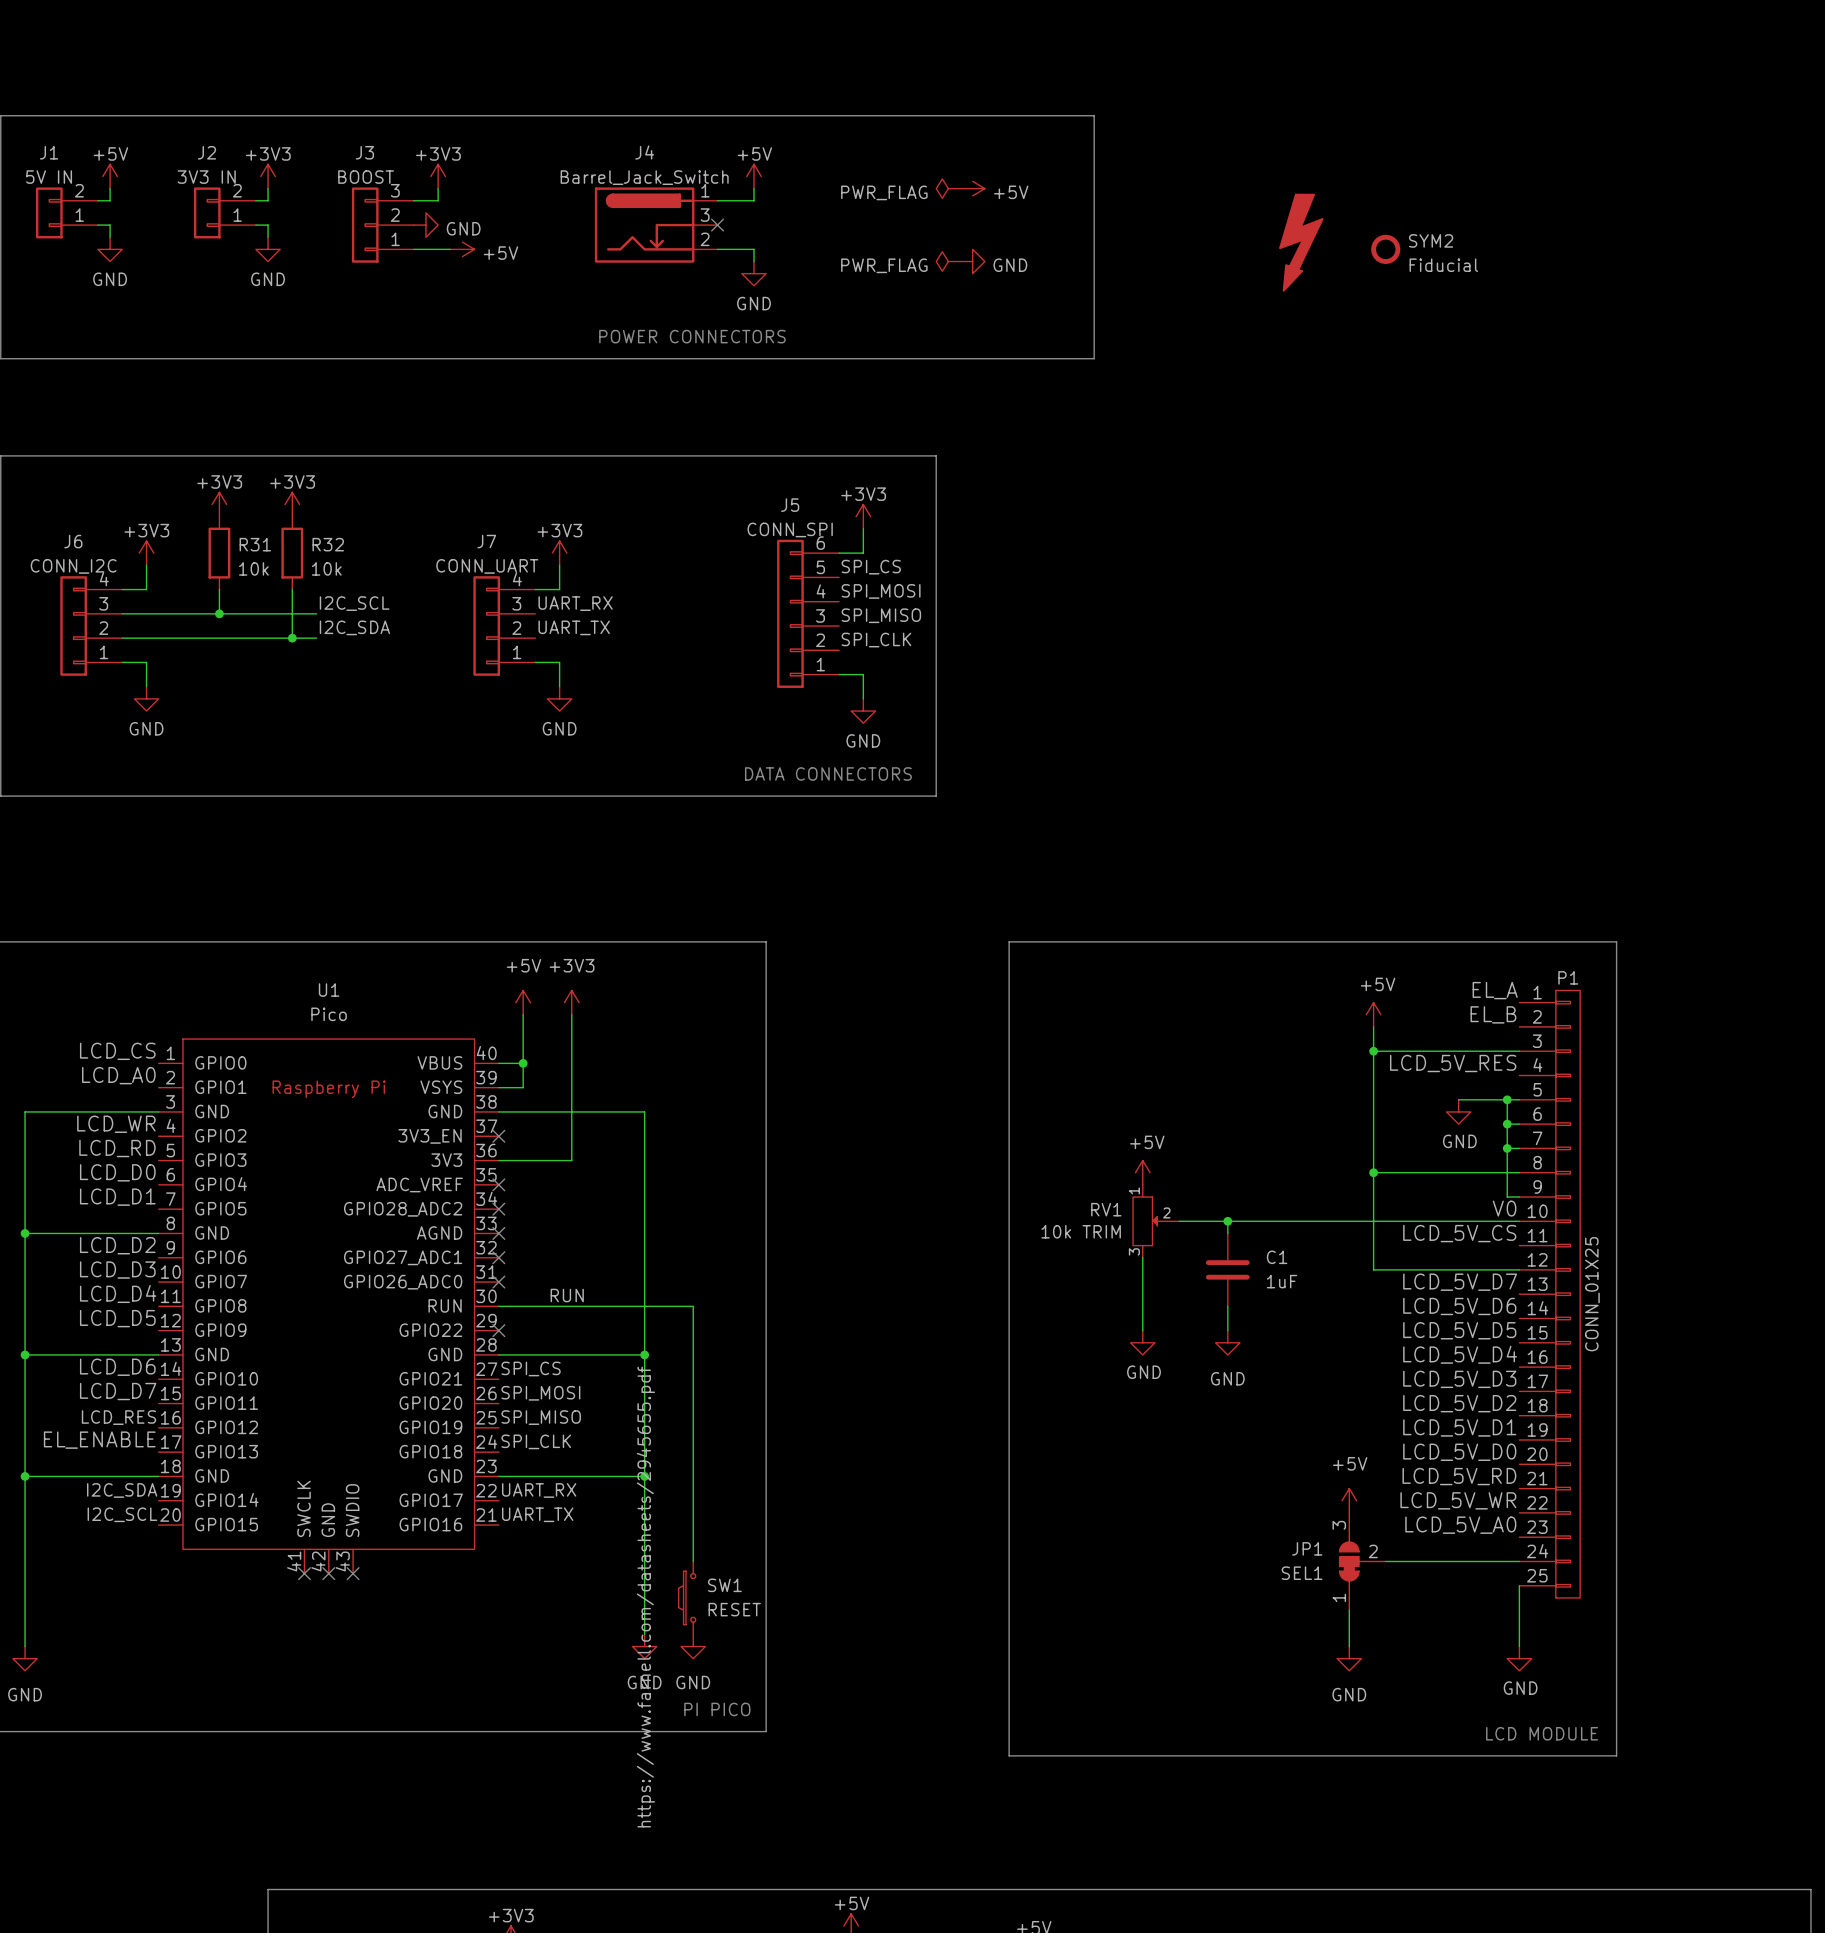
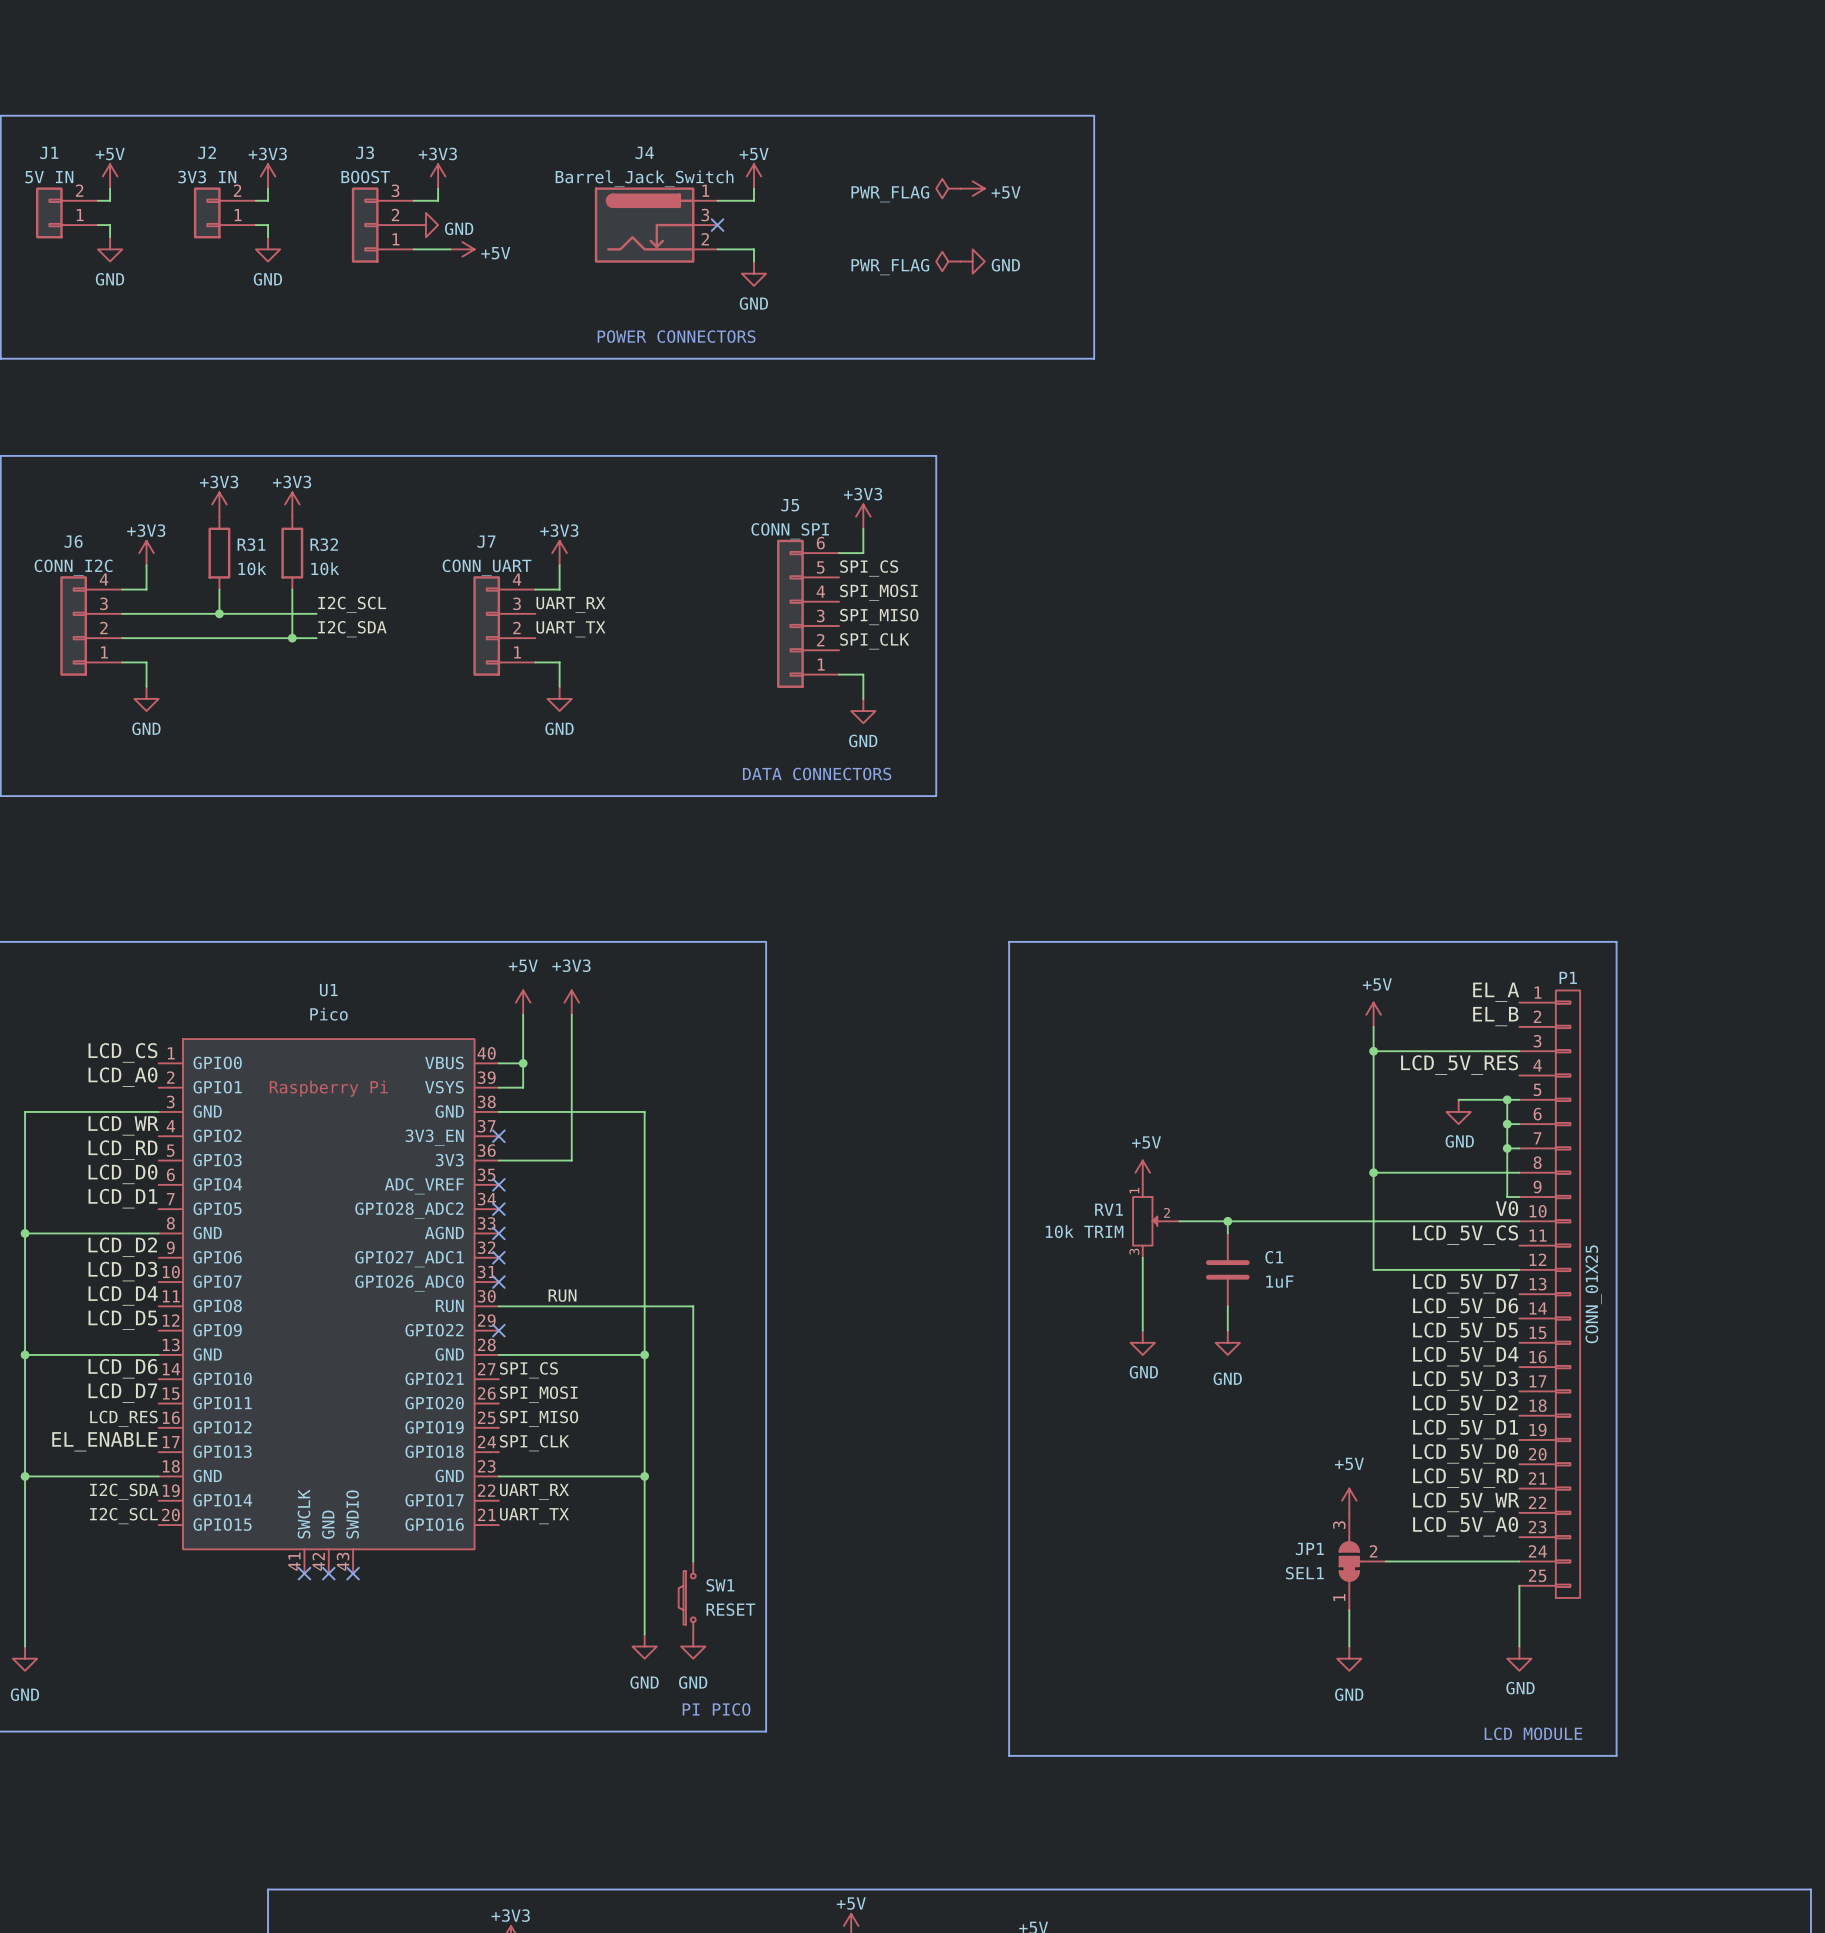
part: (1301, 242) -> none
SYM2: Fiducial (1385, 249) -> none
SW1 text: https://www.farnell.com/datasheets/2945655.pdf (645, 1597) -> none

